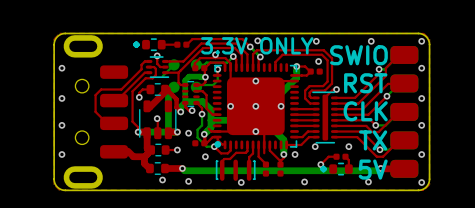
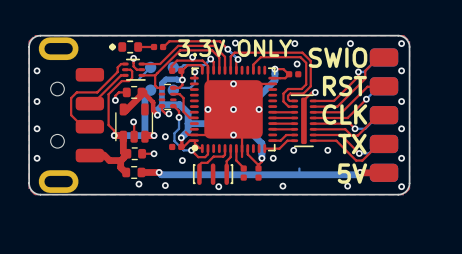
top track: (336, 156) (328, 156) (320, 164) -> none
part: (341, 156) -> none
top track: (345, 156) (348, 160) (348, 169) -> none
via: (320, 164) -> none
part: (336, 169) -> none

